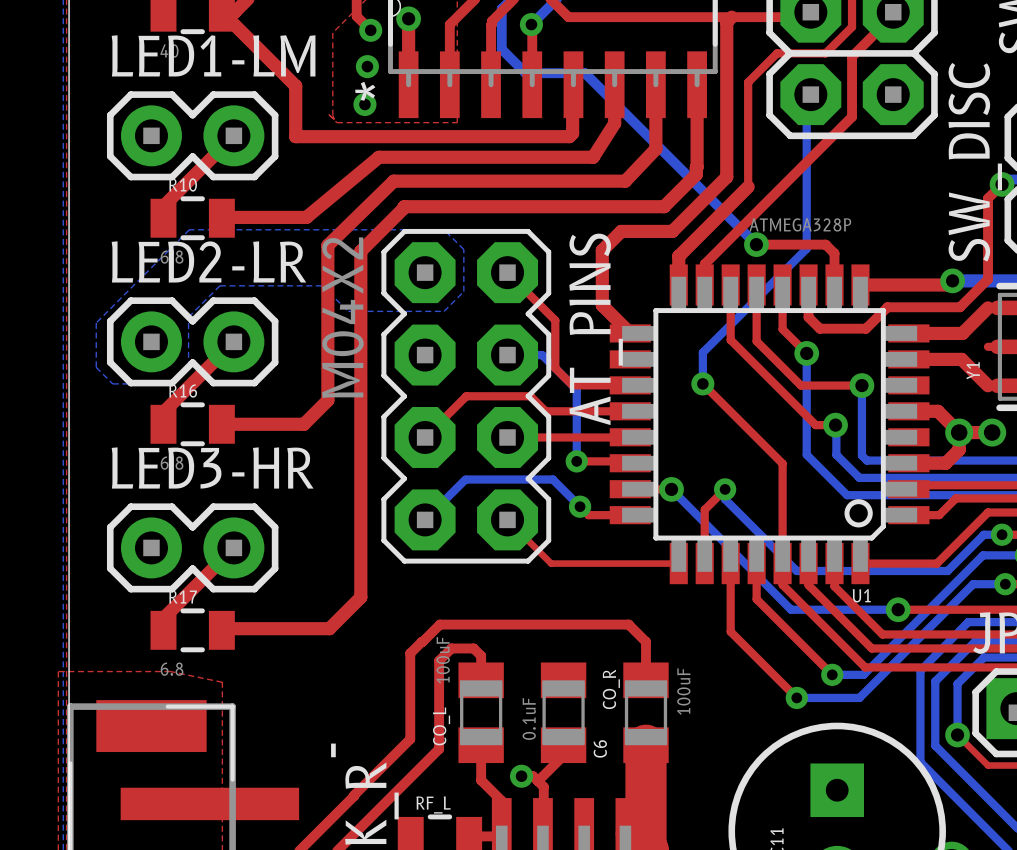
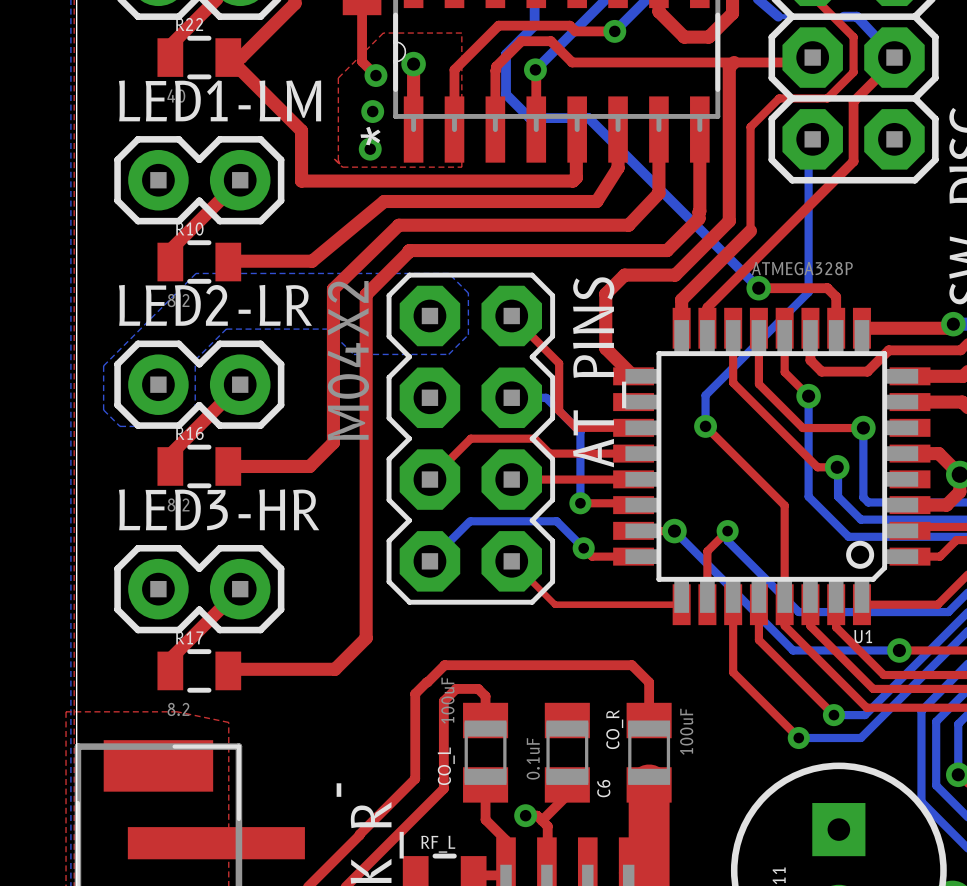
R10 value: 6.8 (172, 257) -> 8.2 (178, 300)
R16 value: 6.8 (172, 463) -> 8.2 (178, 505)
R17 value: 6.8 (172, 669) -> 8.2 (178, 709)

